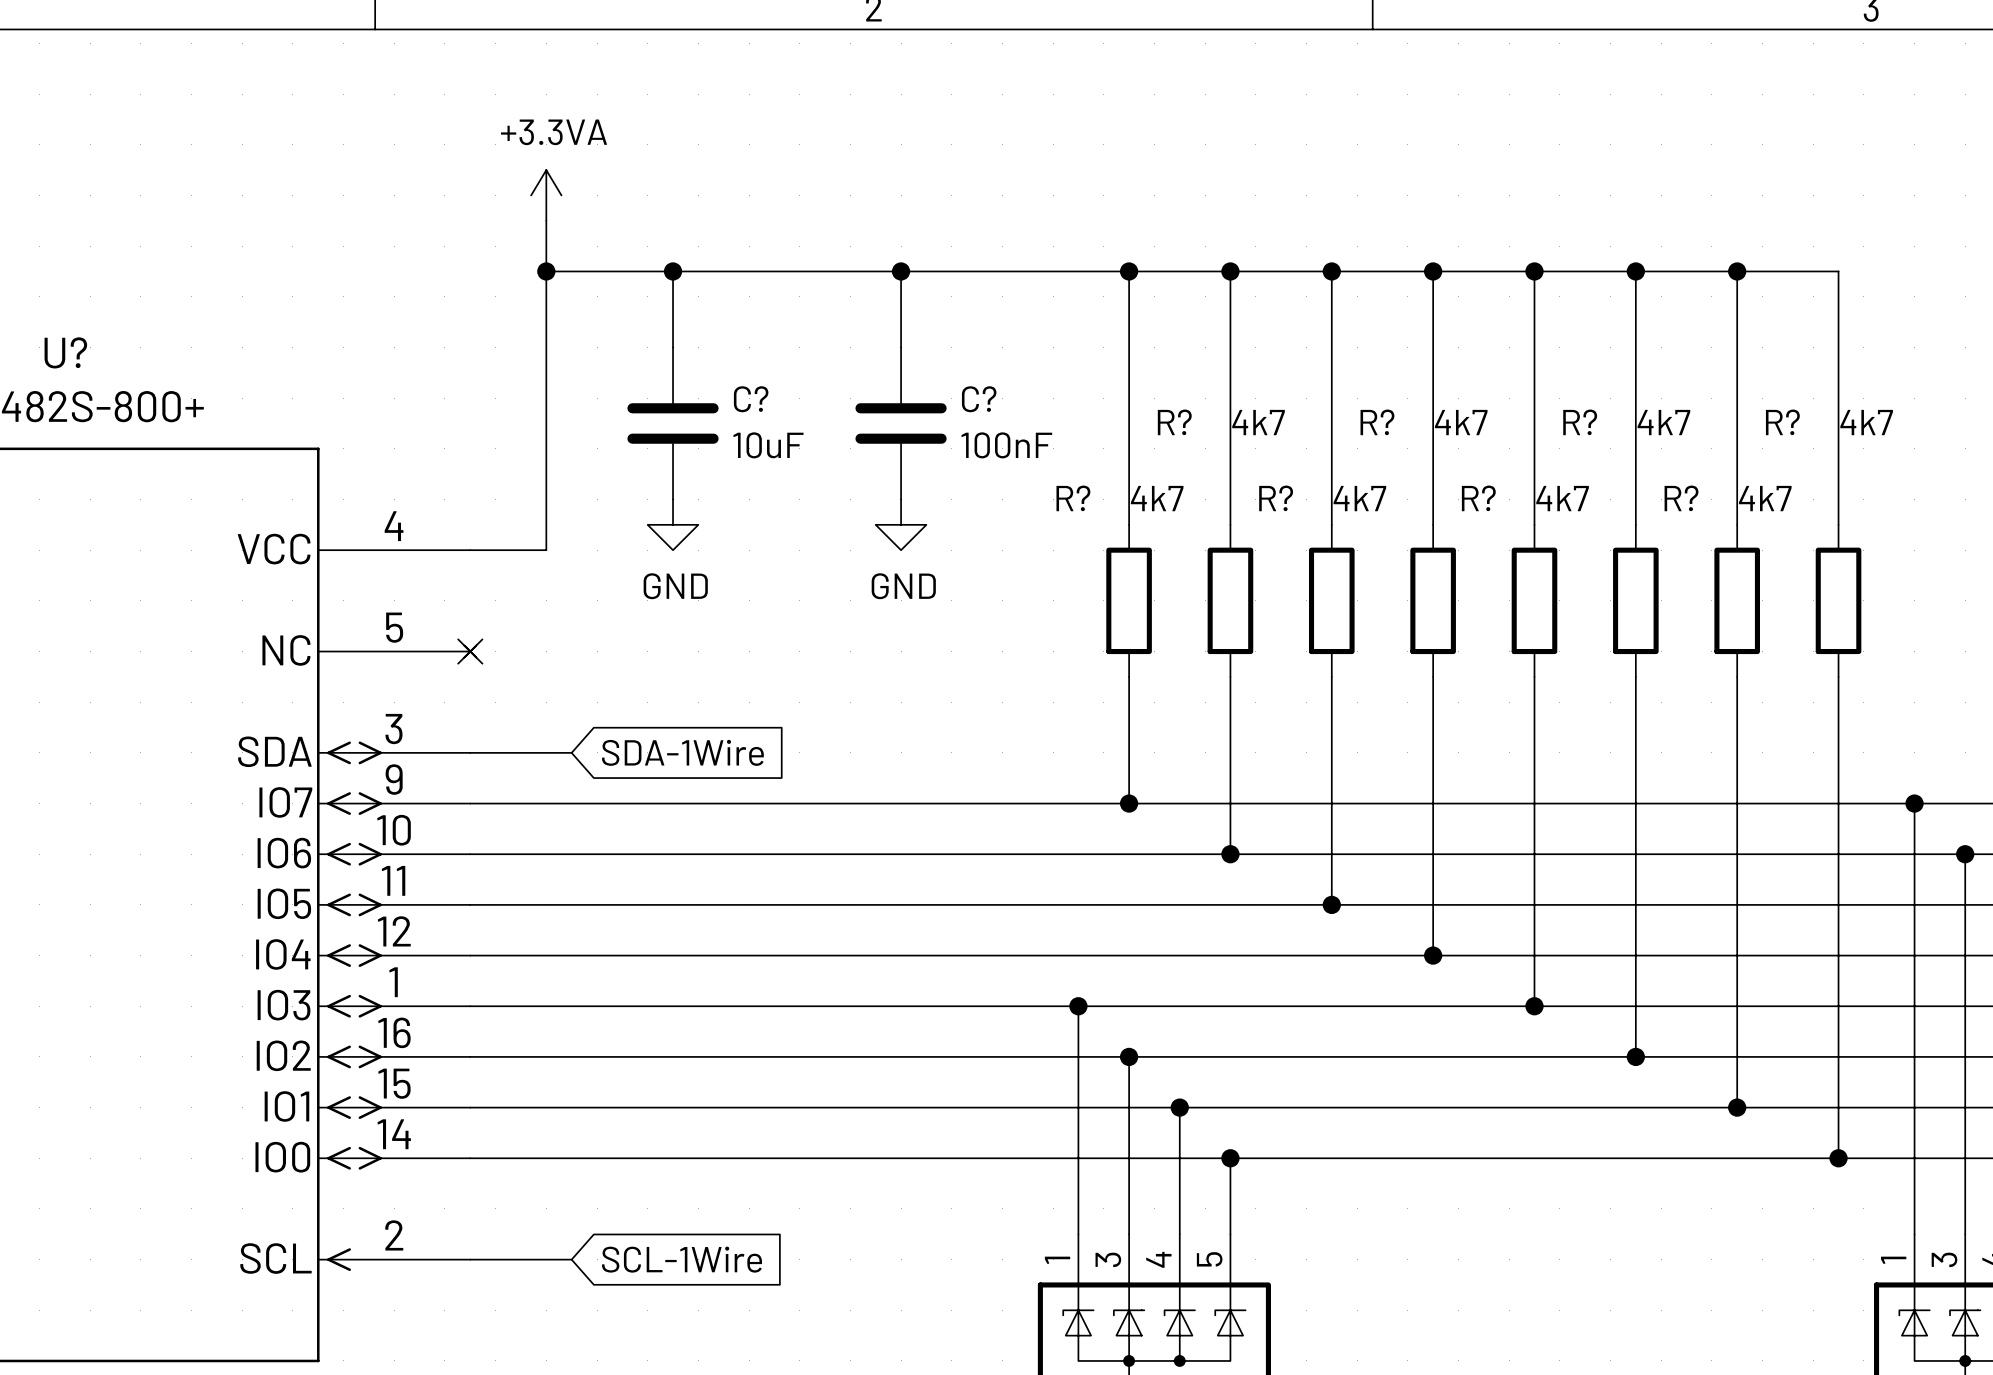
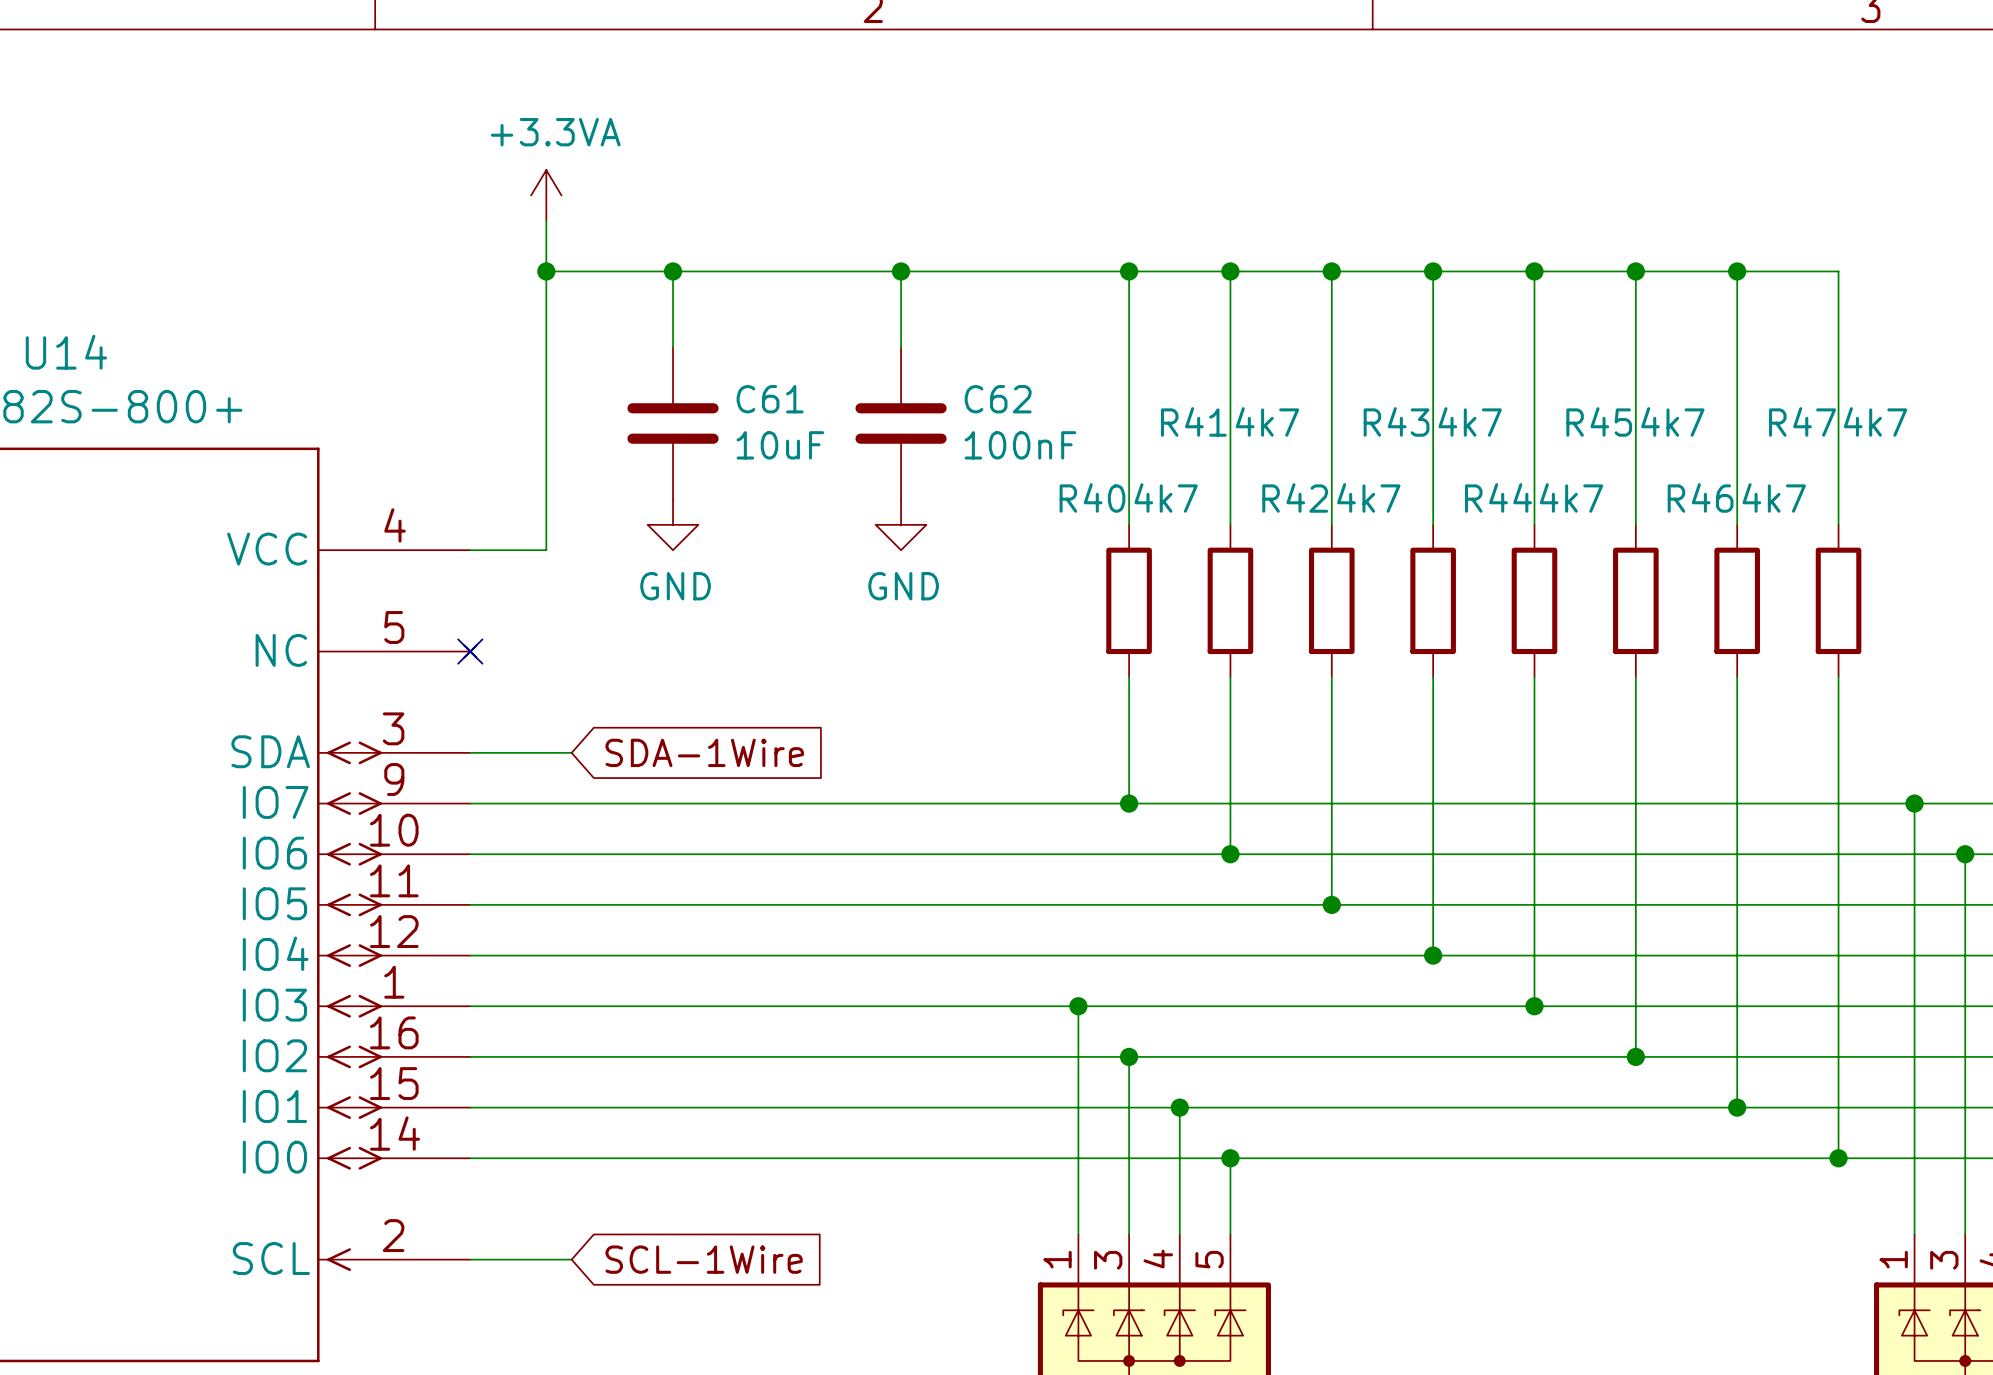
U? name: U? (65, 352) -> U14 (66, 352)
C? name: C? (751, 399) -> C61 (770, 399)
C? name: C? (979, 399) -> C62 (998, 399)
R? name: R? (1174, 422) -> R41 (1193, 421)
R? name: R? (1377, 422) -> R43 (1396, 421)
R? name: R? (1580, 422) -> R45 (1599, 421)
R? name: R? (1782, 422) -> R47 (1802, 421)
R? name: R? (1073, 498) -> R40 (1092, 497)
R? name: R? (1276, 498) -> R42 (1295, 497)
R? name: R? (1478, 498) -> R44 (1498, 497)
R? name: R? (1681, 498) -> R46 (1700, 497)

